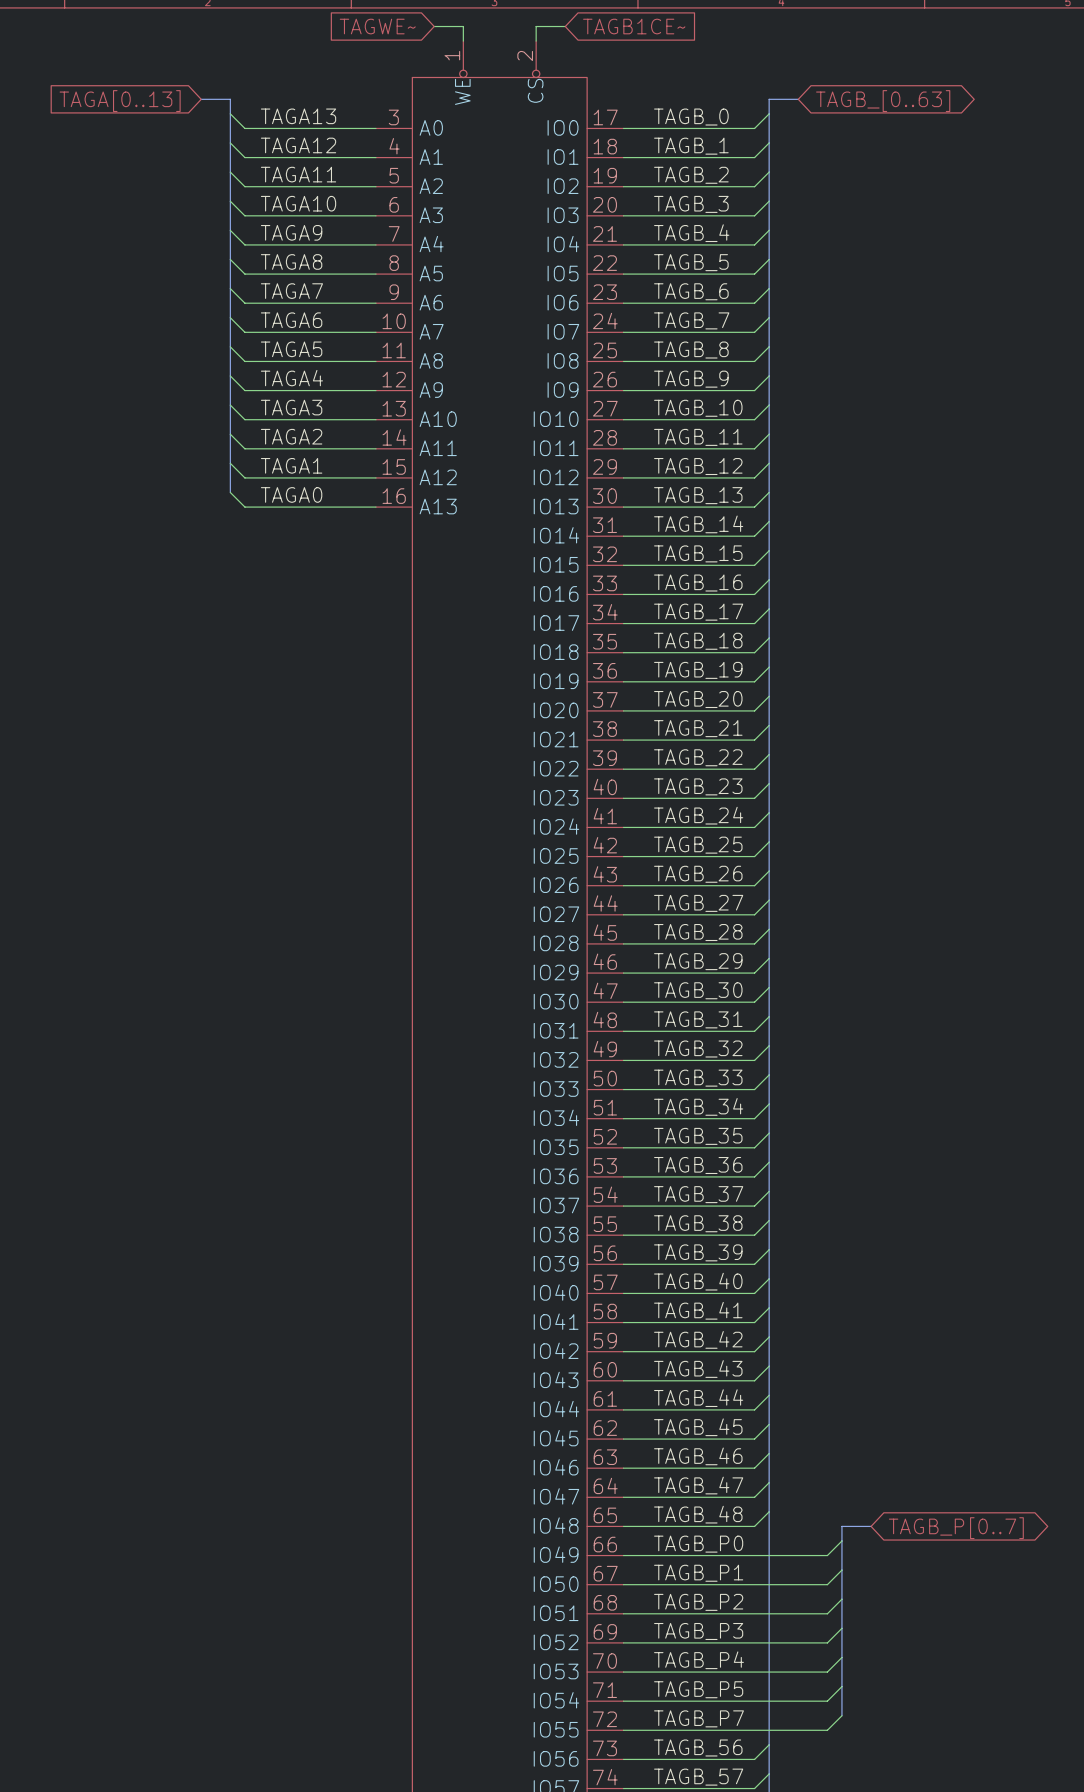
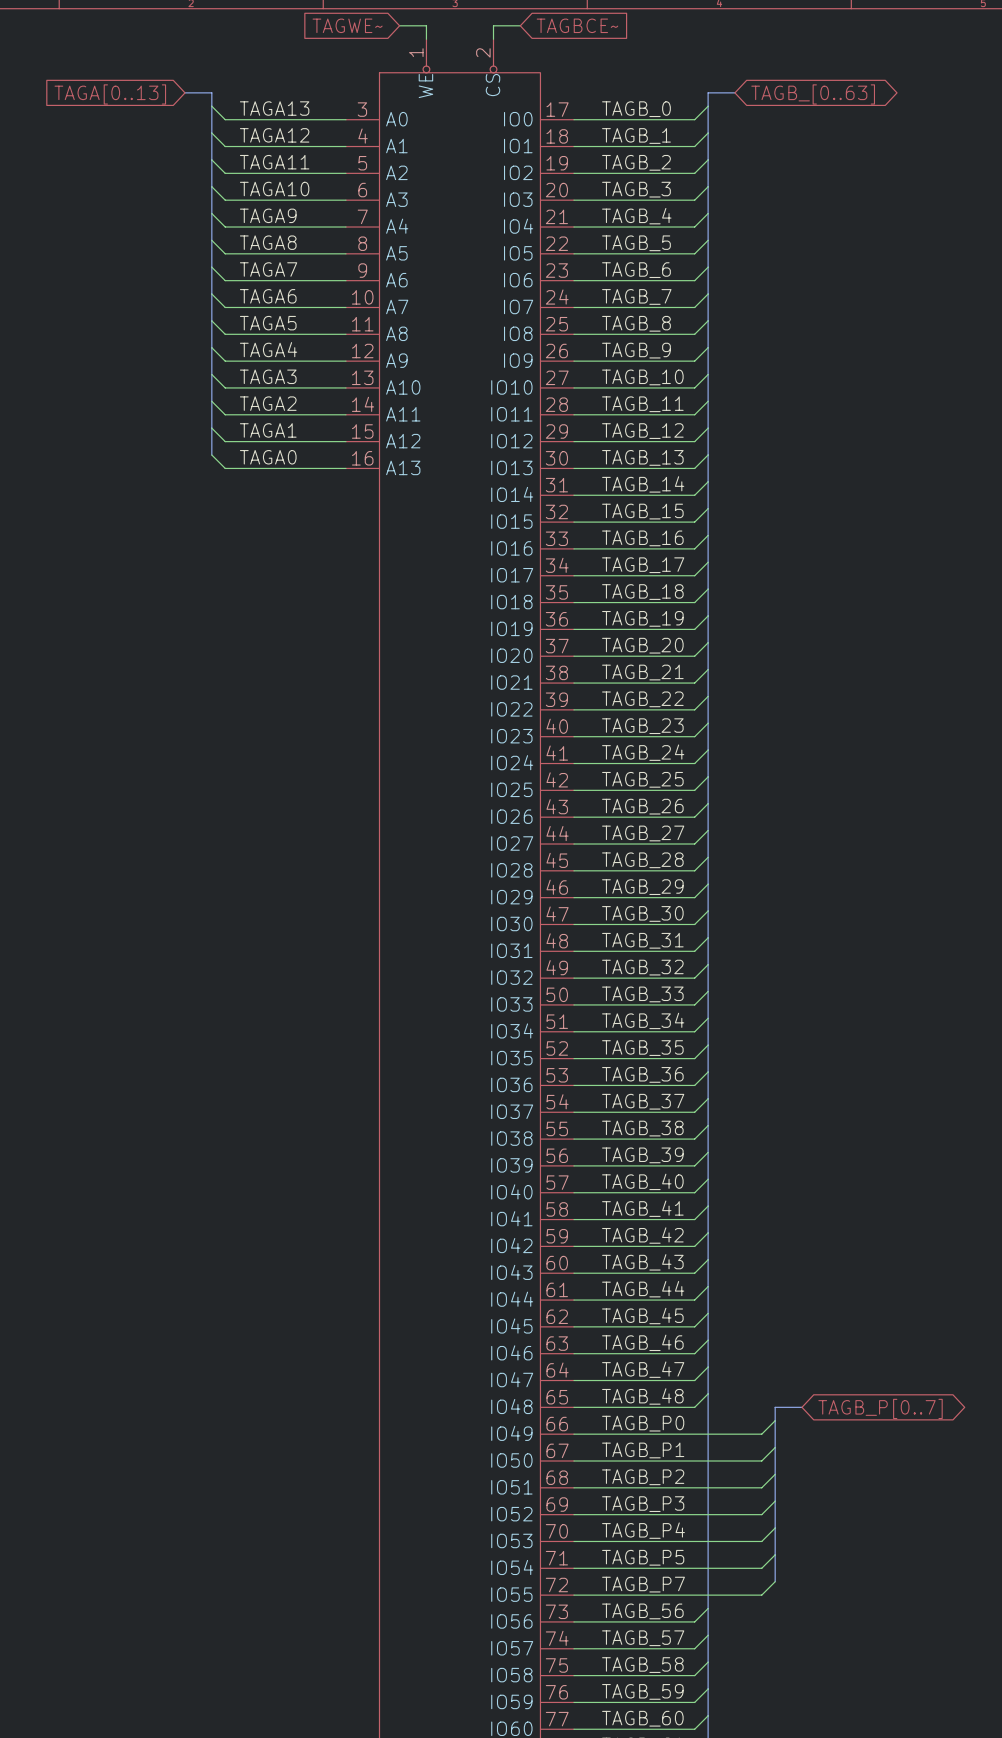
global label: TAGB1CE~ (634, 26) -> TAGBCE~ (577, 25)

